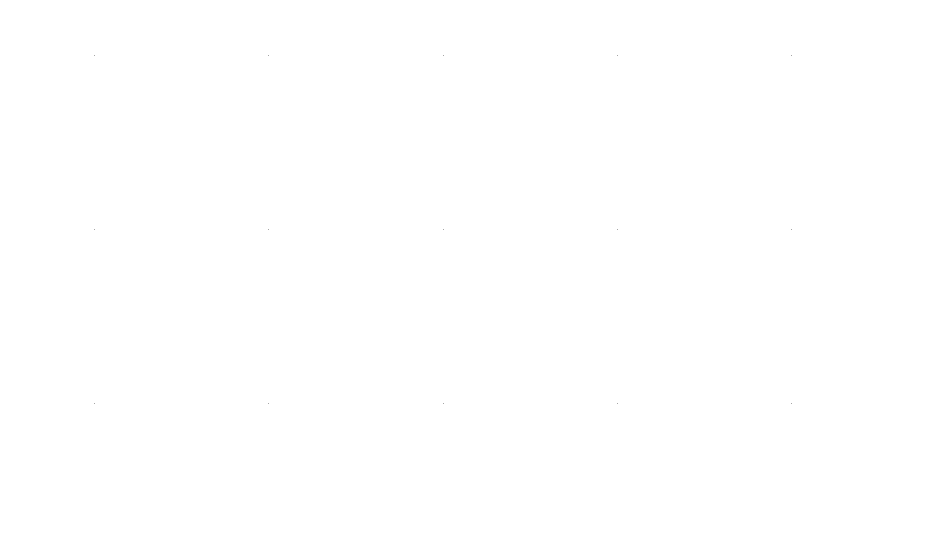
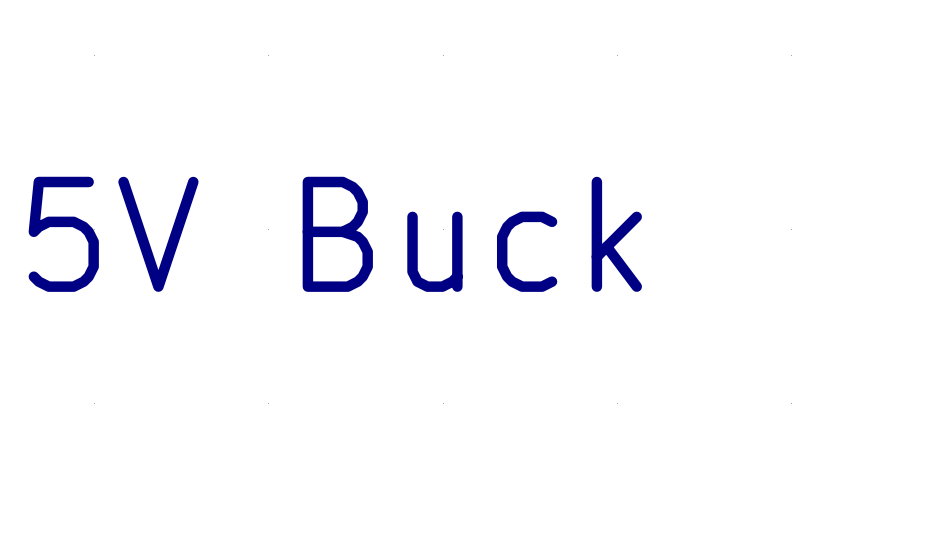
text: none -> 5V Buck (335, 234)

